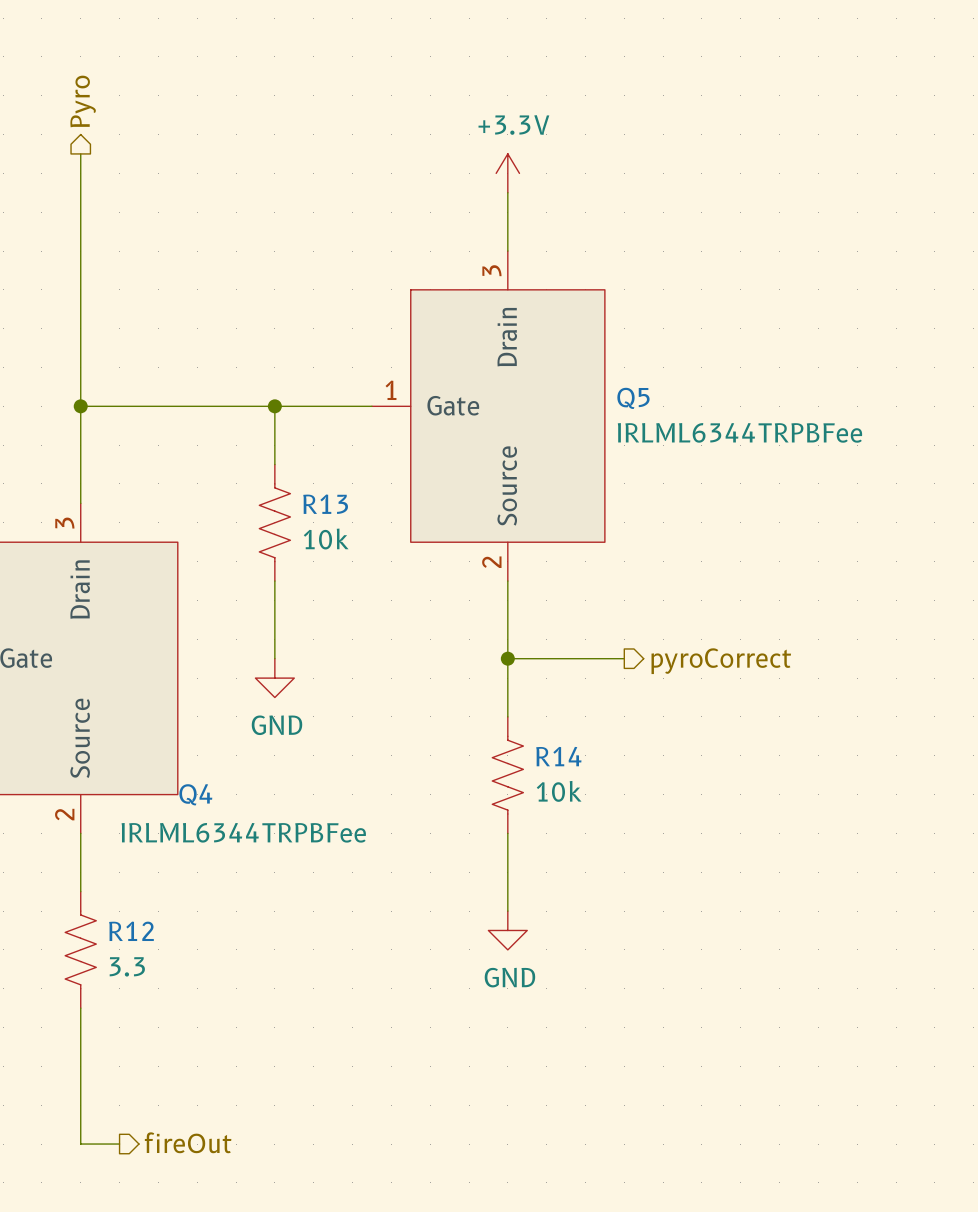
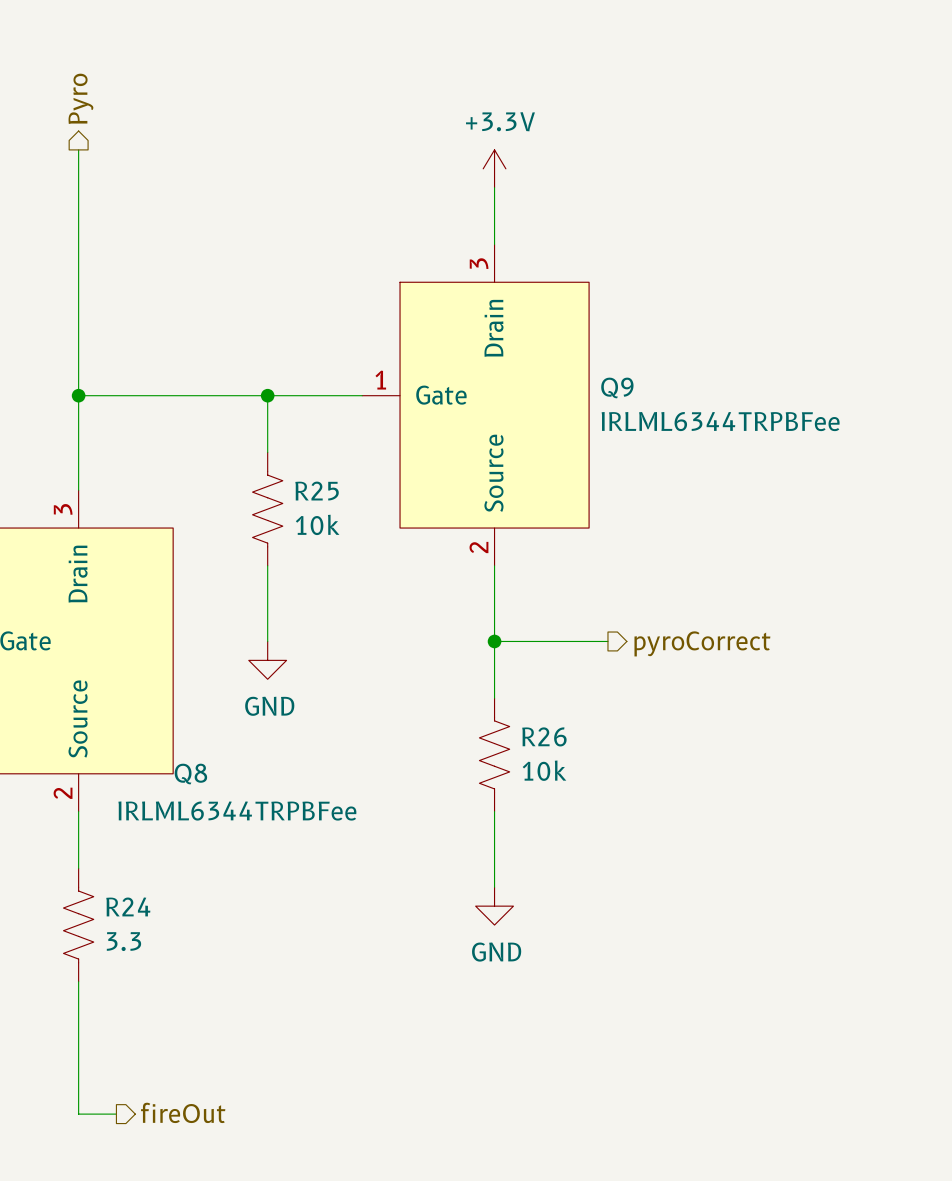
Q5 name: Q5 (633, 398) -> Q9 (617, 387)
R13 name: R13 (325, 504) -> R25 (317, 491)
R14 name: R14 (558, 756) -> R26 (544, 736)
Q4 name: Q4 (195, 794) -> Q8 (190, 774)
R12 name: R12 (131, 931) -> R24 (128, 906)

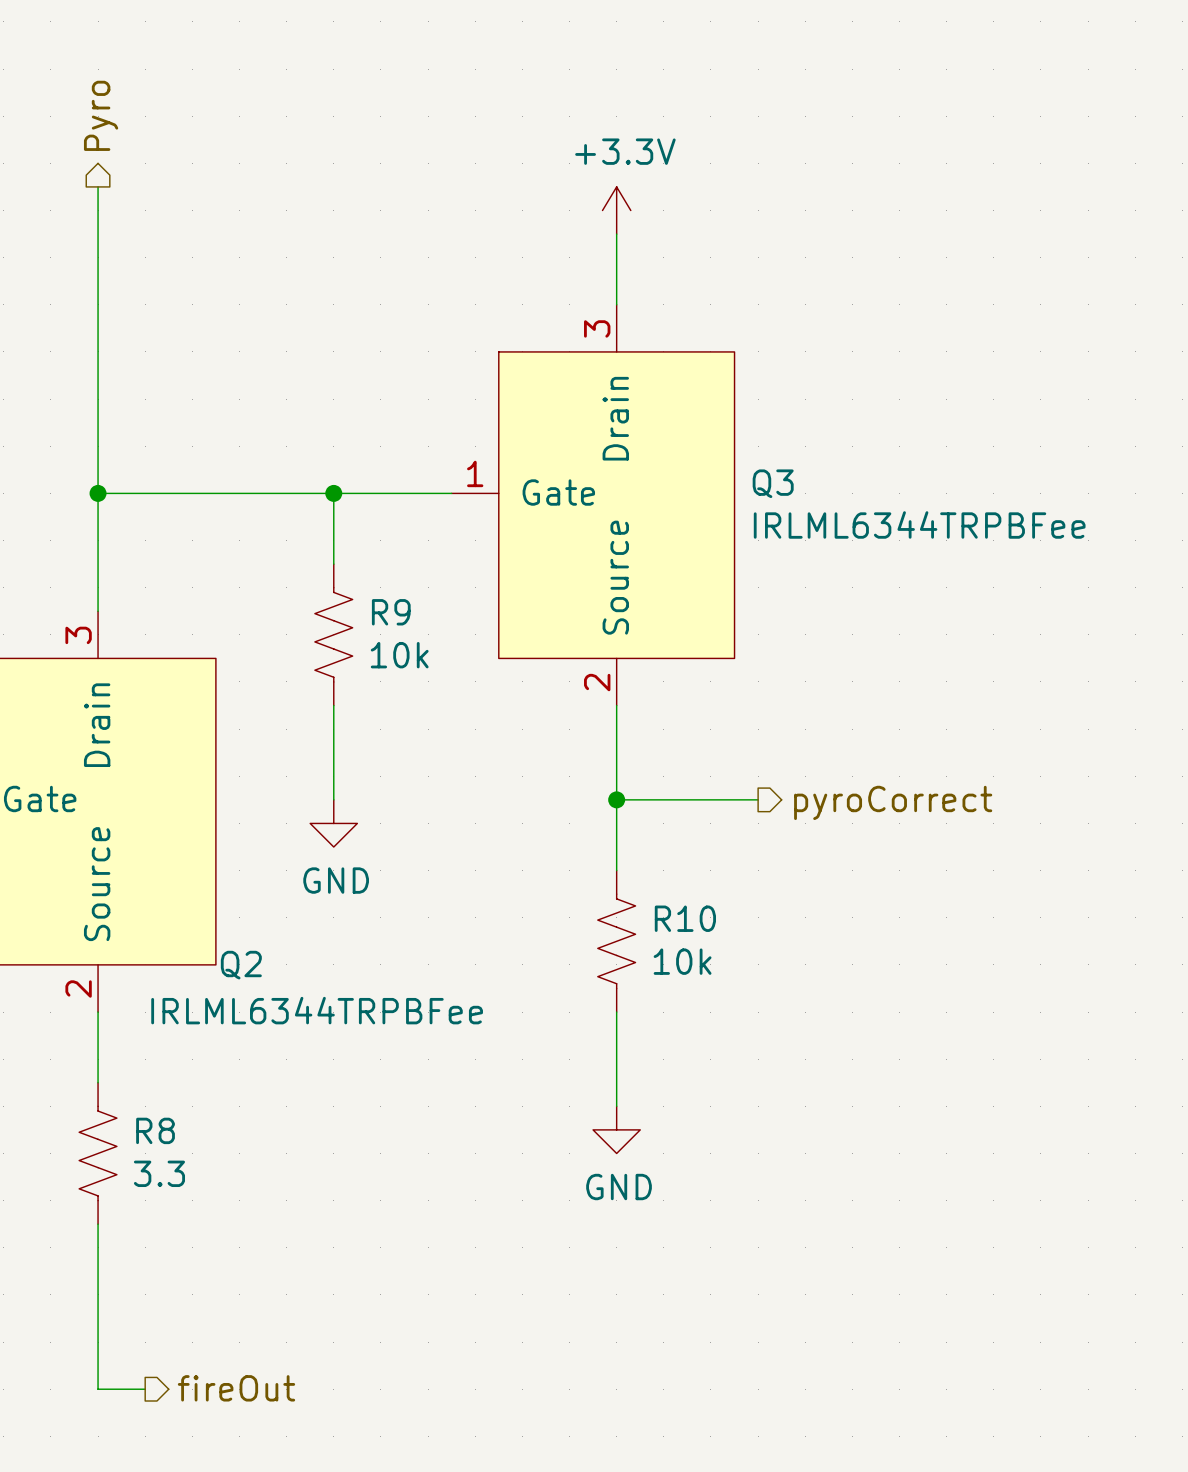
Q9 name: Q9 (617, 387) -> Q3 (773, 483)
R25 name: R25 (317, 491) -> R9 (391, 612)
R26 name: R26 (544, 736) -> R10 (685, 918)
Q8 name: Q8 (190, 774) -> Q2 (241, 965)
R24 name: R24 (128, 906) -> R8 (155, 1130)

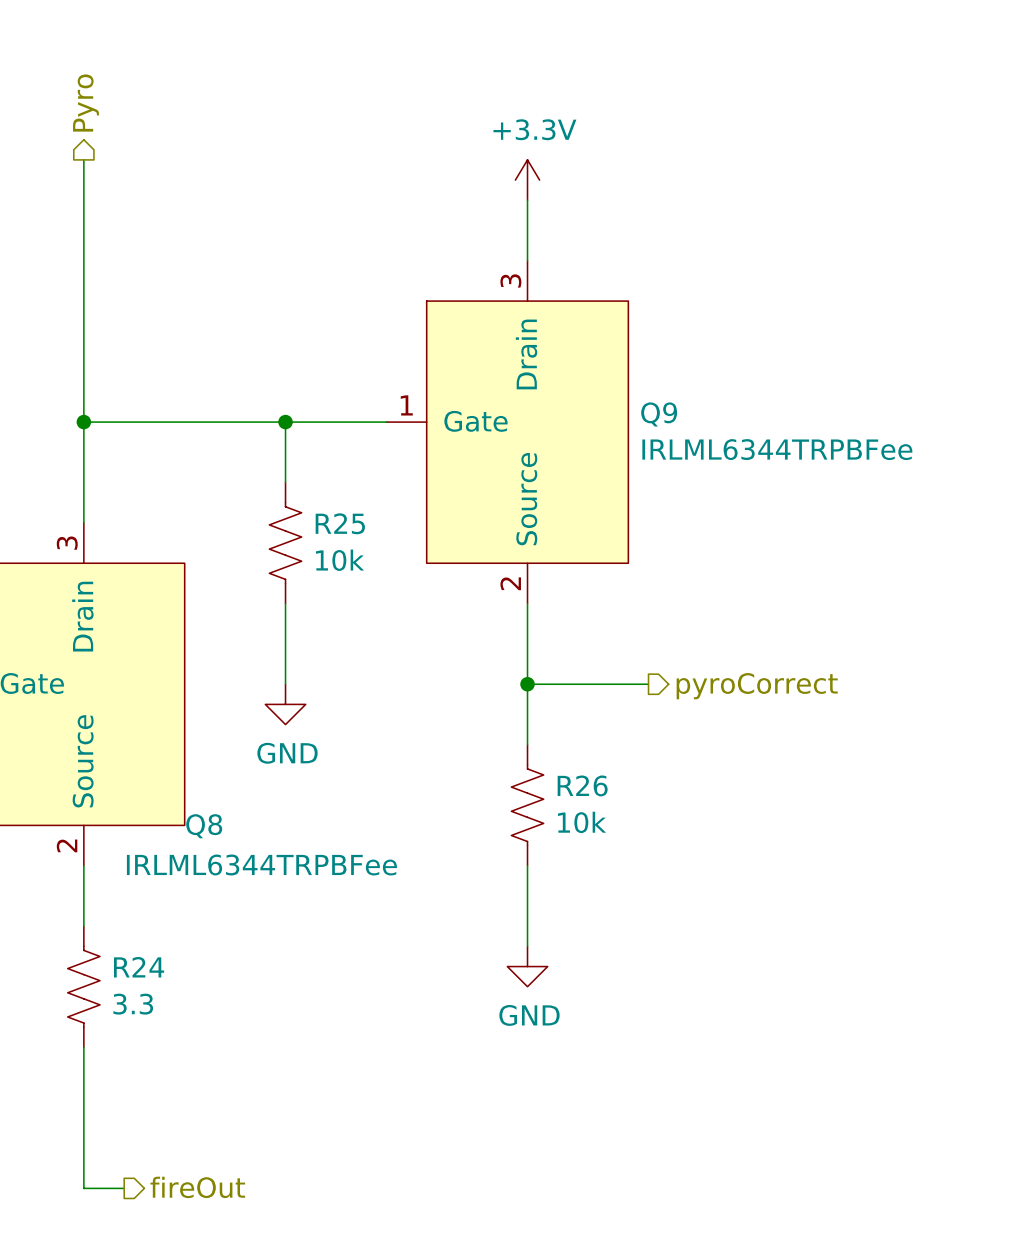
Q3 name: Q3 (773, 483) -> Q9 (659, 414)
R9 name: R9 (391, 612) -> R25 (340, 523)
R10 name: R10 (685, 918) -> R26 (582, 785)
Q2 name: Q2 (241, 965) -> Q8 (204, 826)
R8 name: R8 (155, 1130) -> R24 (139, 967)

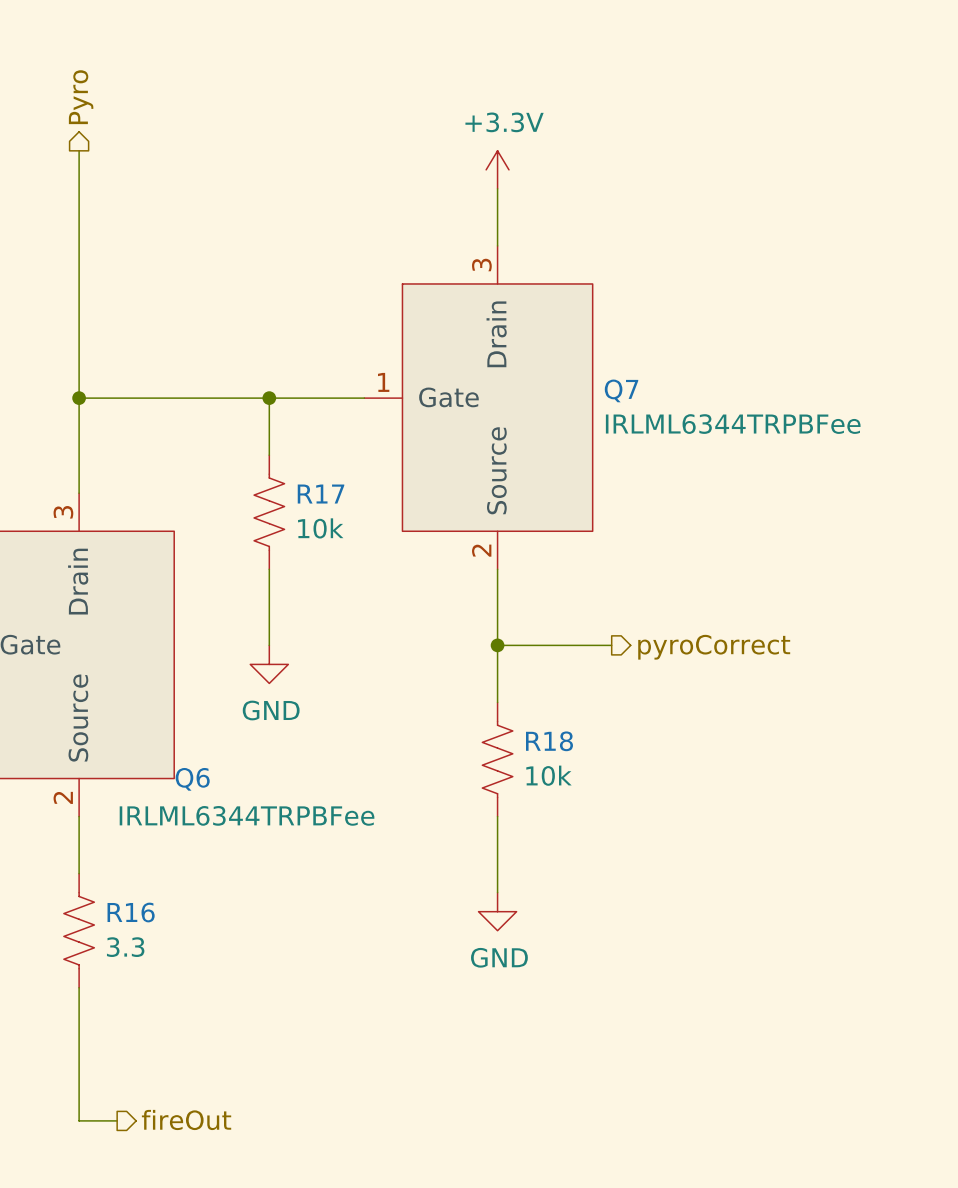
Q9 name: Q9 (659, 414) -> Q7 (621, 390)
R25 name: R25 (340, 523) -> R17 (321, 494)
R26 name: R26 (582, 785) -> R18 (549, 741)
Q8 name: Q8 (204, 826) -> Q6 (192, 779)
R24 name: R24 (139, 967) -> R16 (131, 912)

